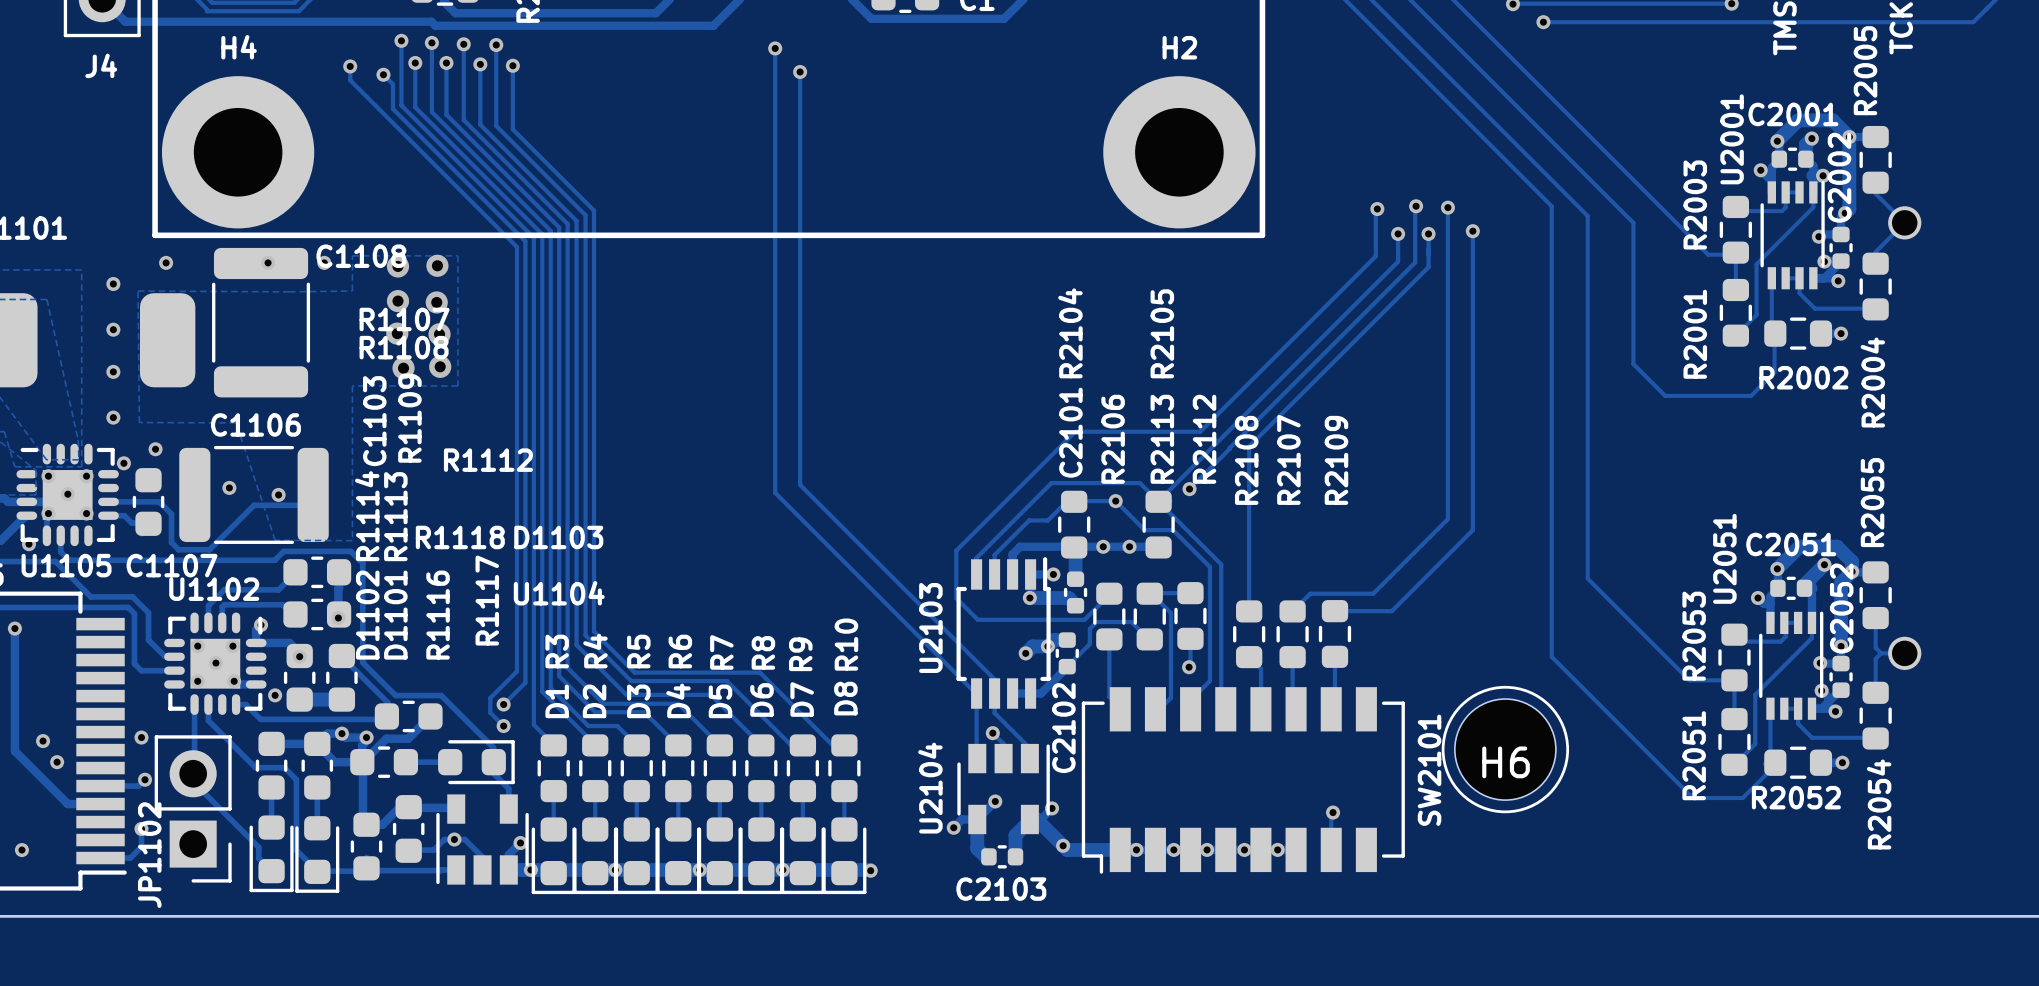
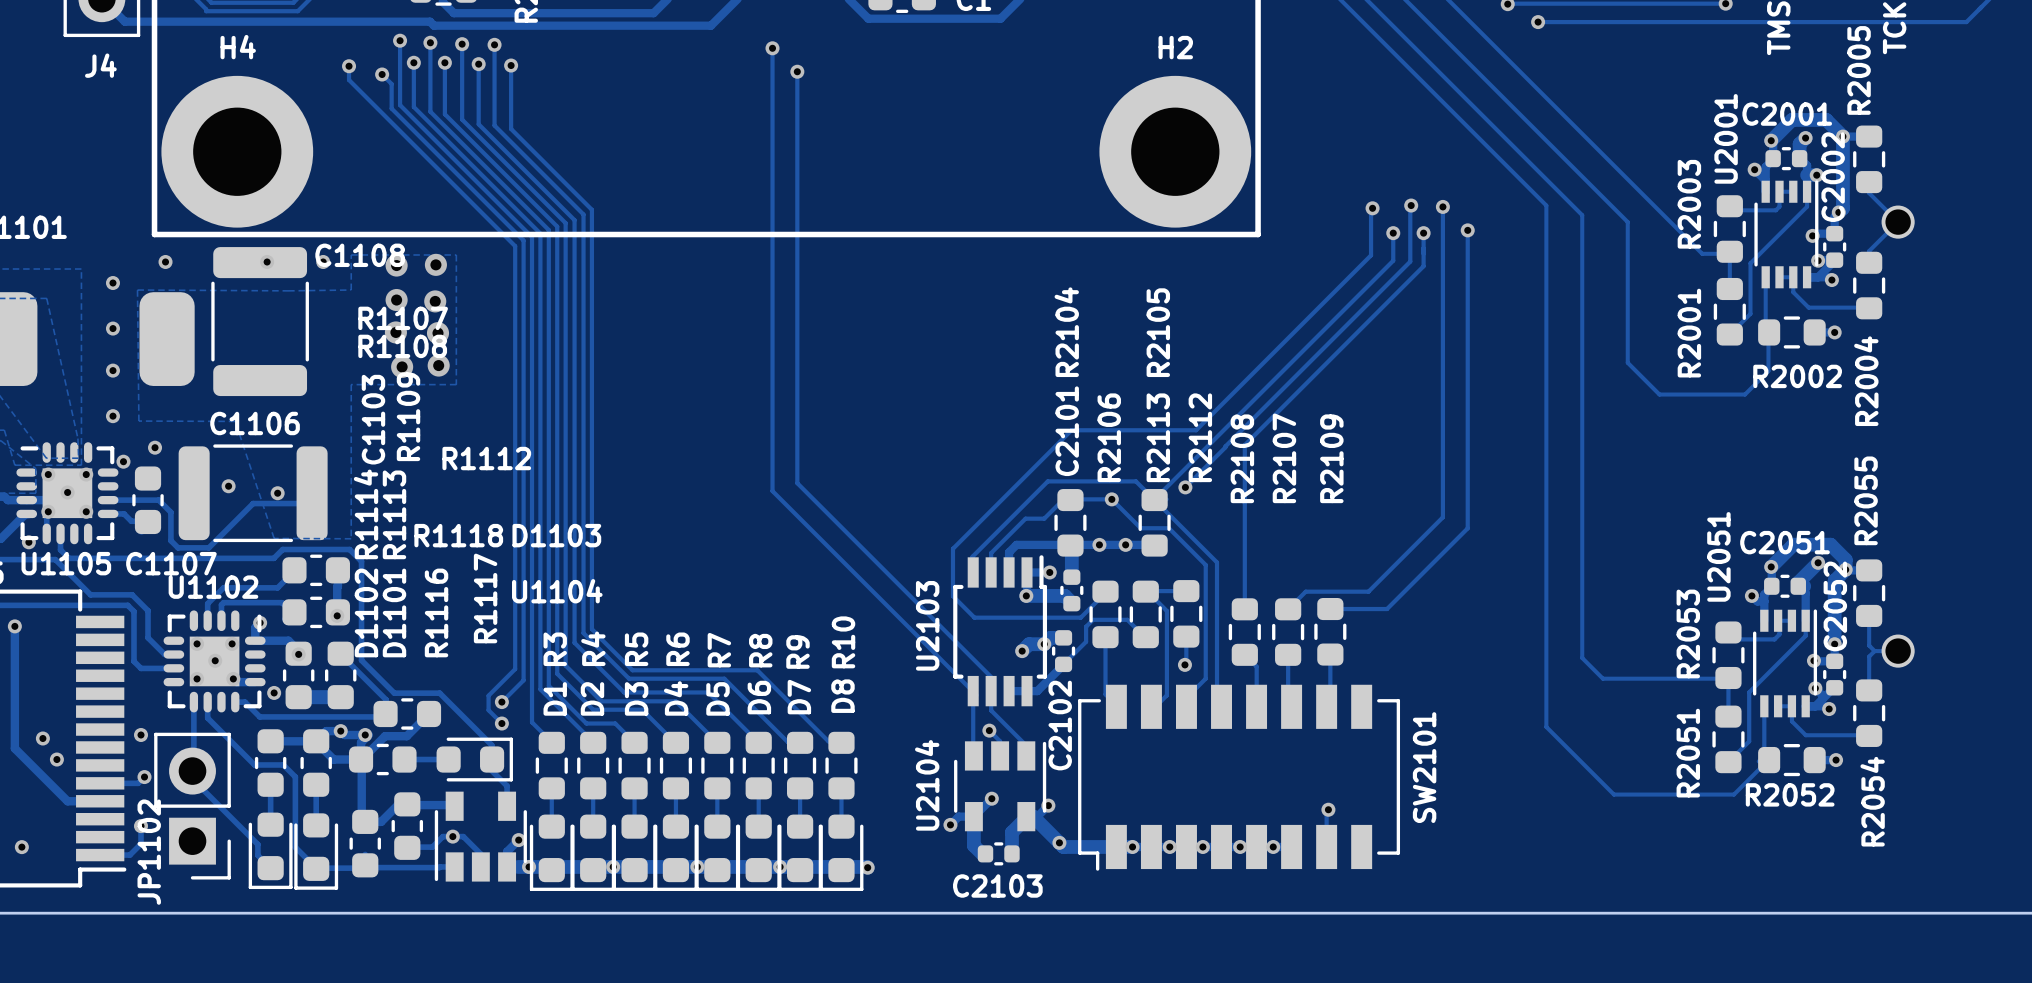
track: (1587, 578) (1689, 680) (1735, 680) -> (1582, 576) (1582, 658) (1602, 678) (1728, 678)
track: (1551, 656) (1692, 798) (1742, 798) (1775, 764) -> (1546, 654) (1546, 726) (1613, 794) (1733, 794) (1765, 762)
H6: (1505, 749) -> none

